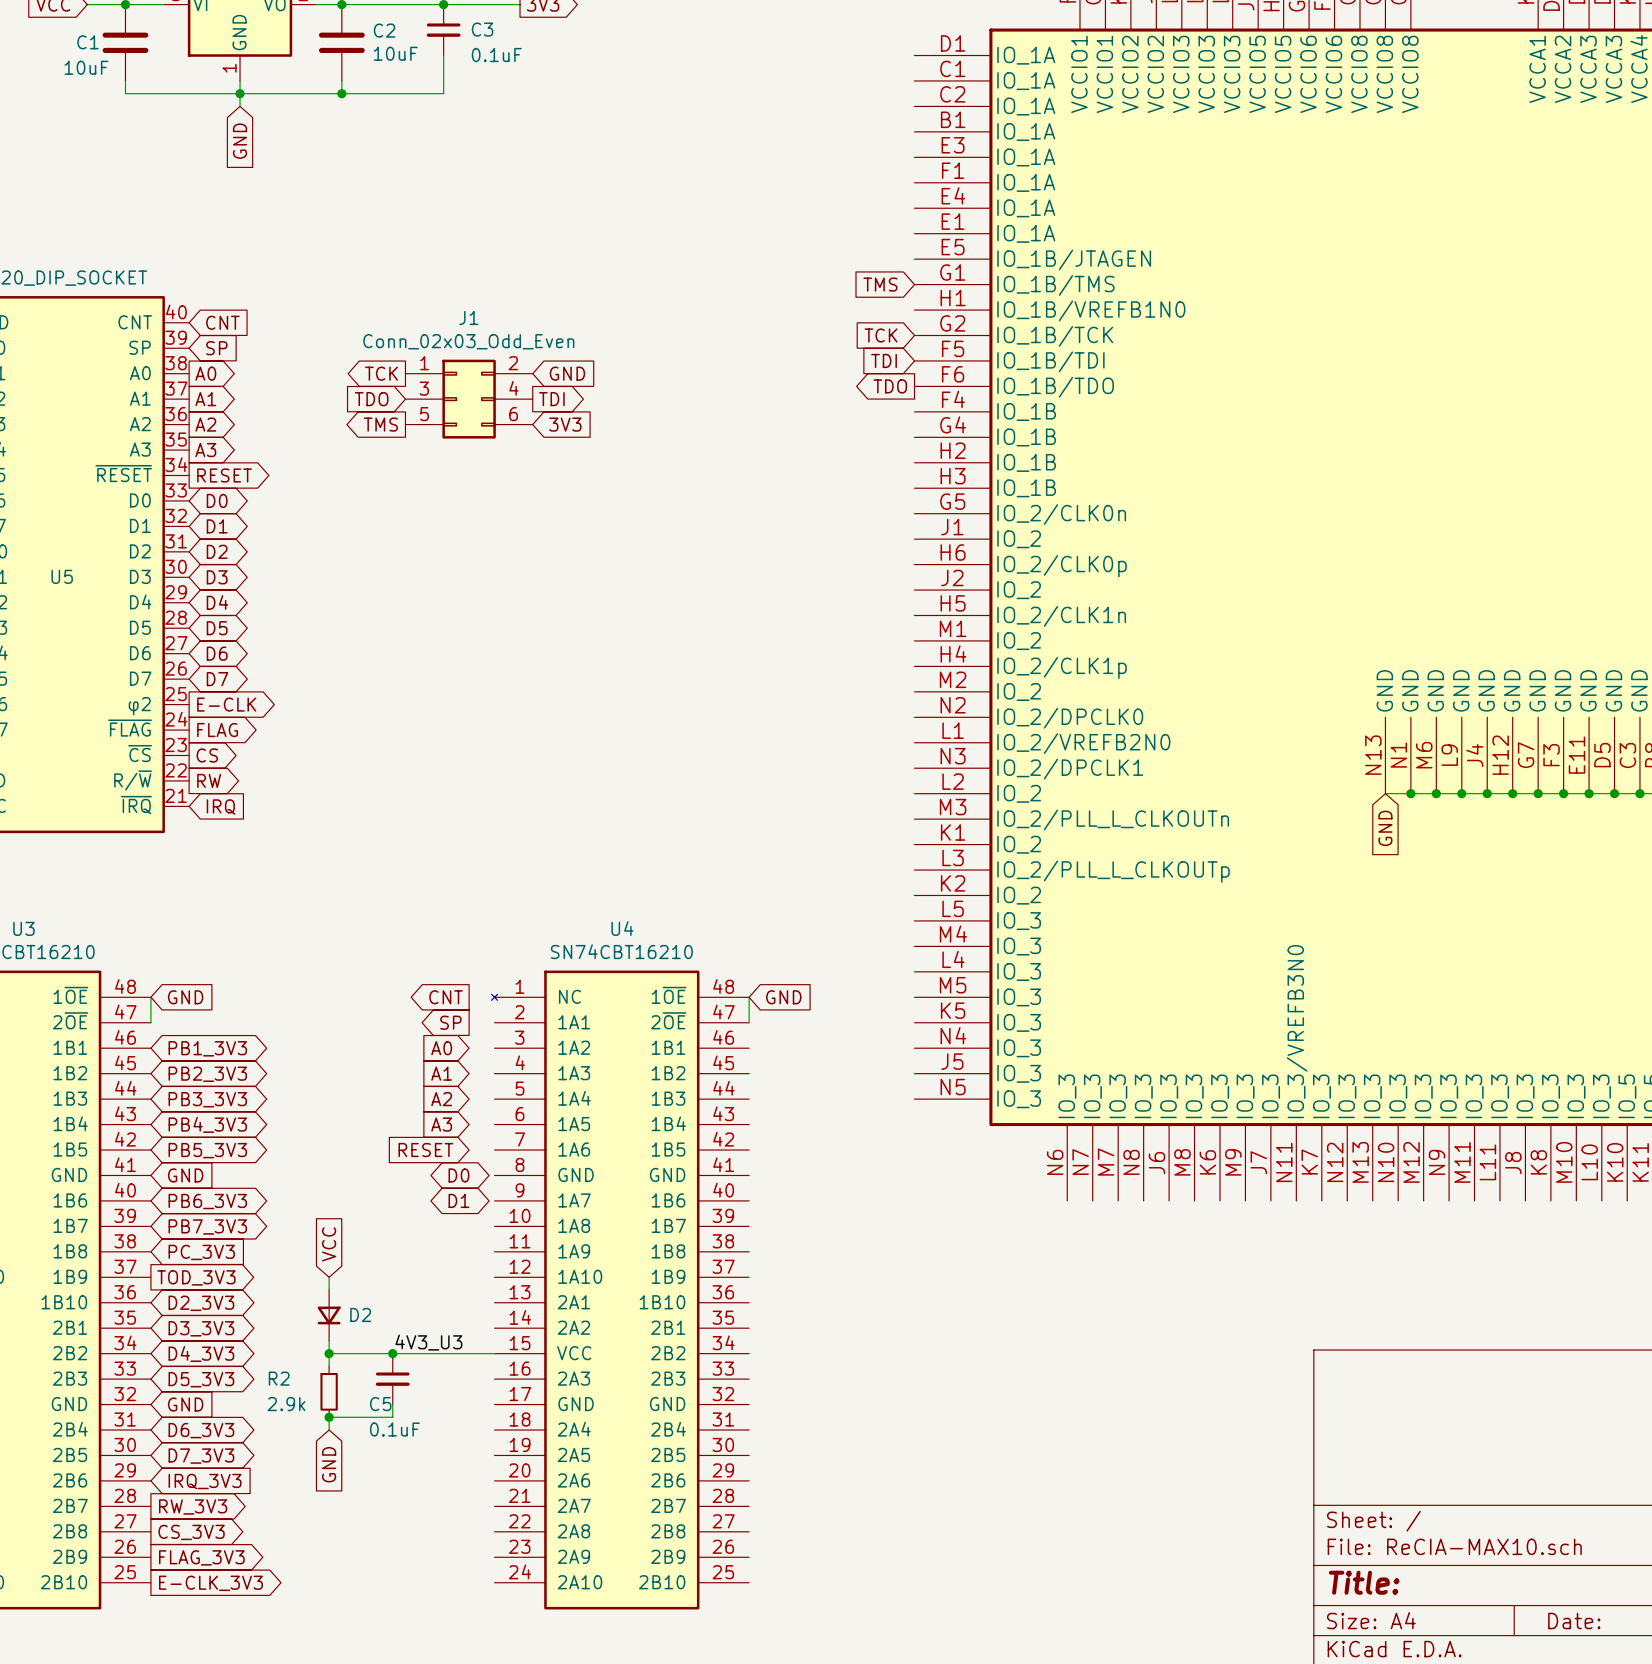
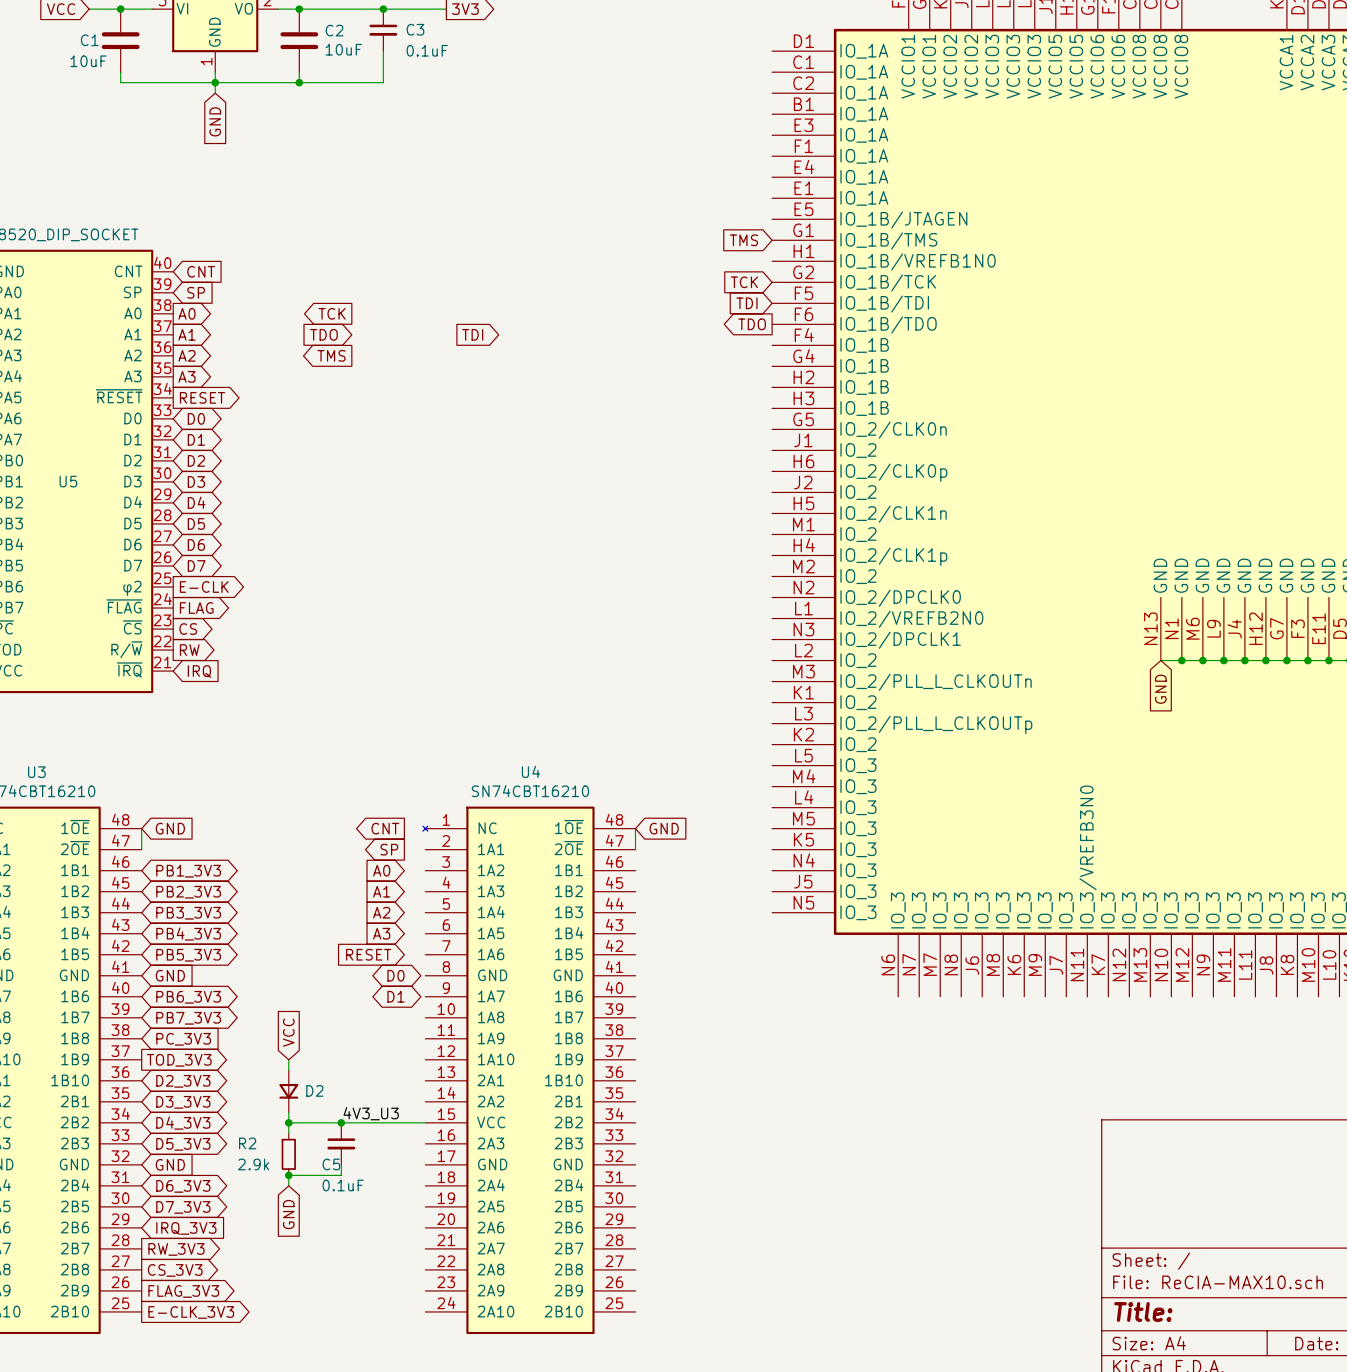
global label: GND (567, 373) -> none
J1: Conn_02x03_Odd_Even (469, 399) -> none
global label: 3V3 (565, 424) -> none

